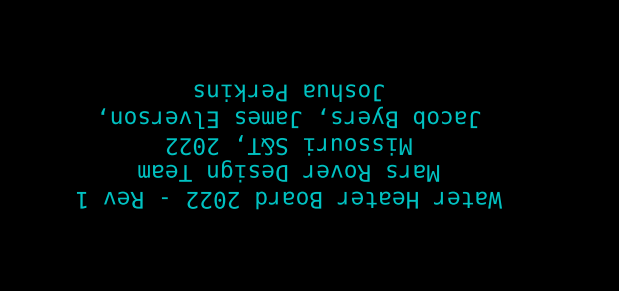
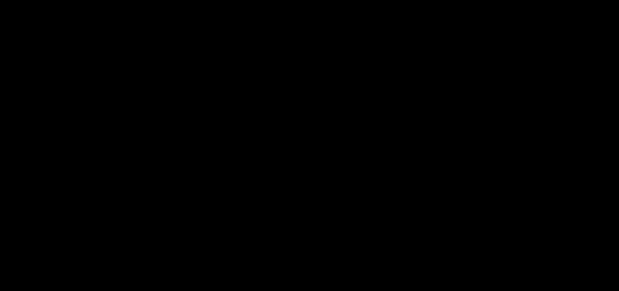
text: Joshua Perkins (289, 93) -> none
text: Jacob Byers, James Elverson, (290, 117) -> none
text: Missouri S&T, 2022 (289, 145) -> none
text: Mars Rover Design Team (288, 171) -> none
text: Water Heater Board 2022 - Rev 1 (289, 200) -> none

